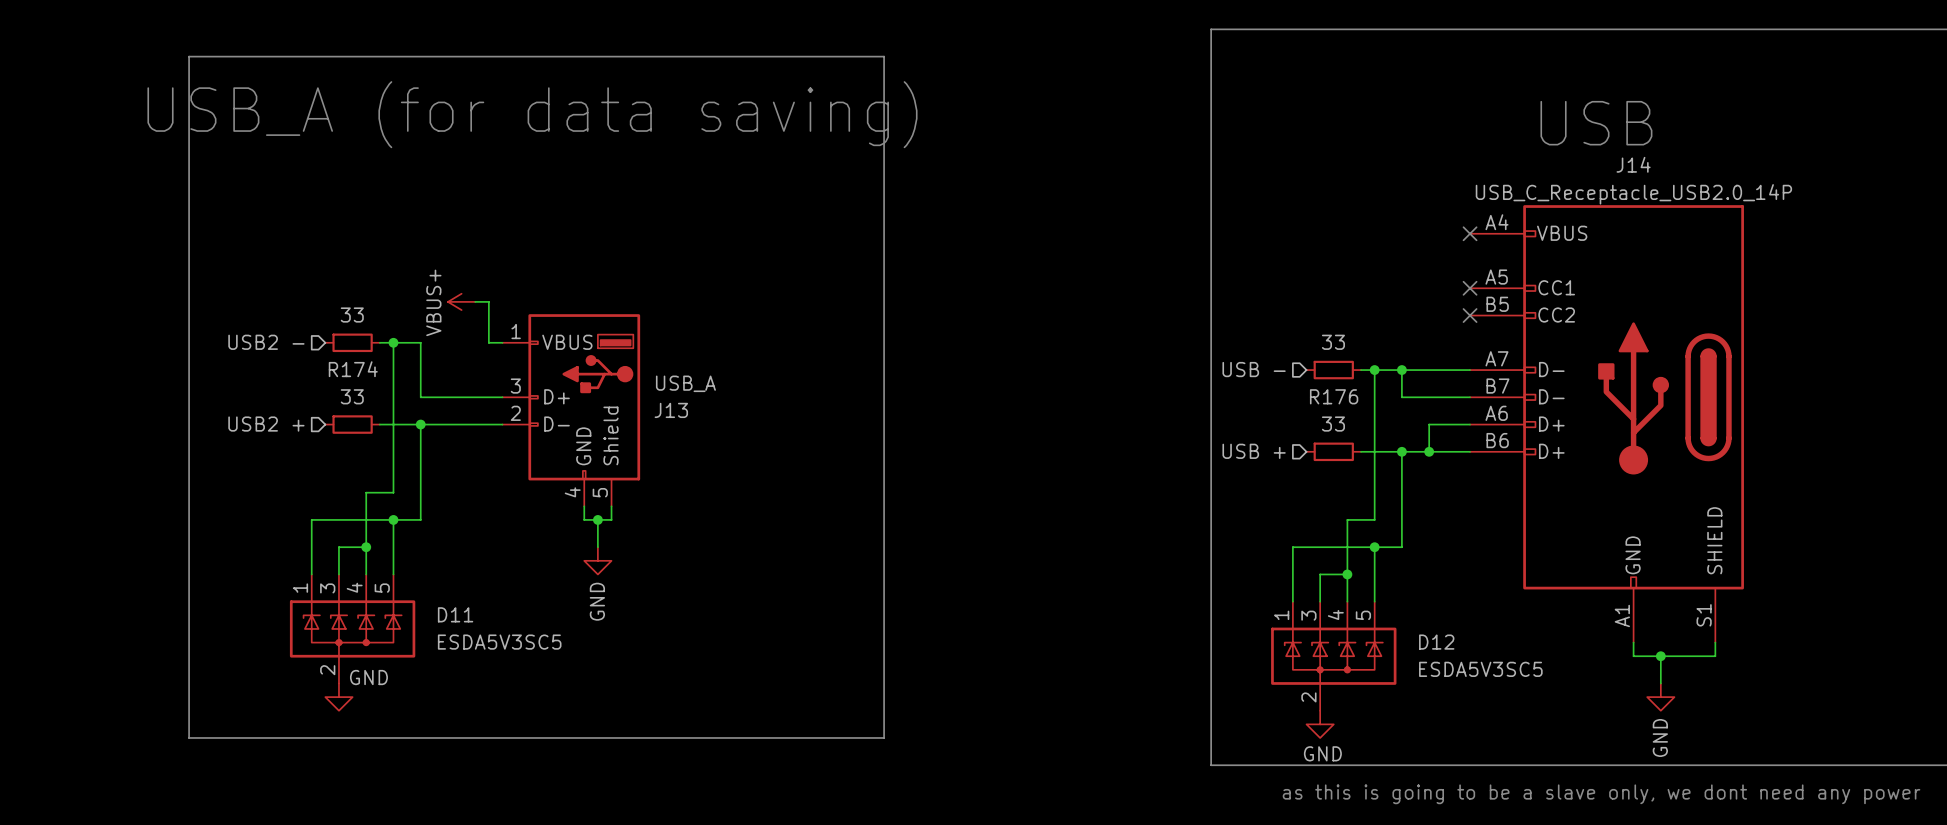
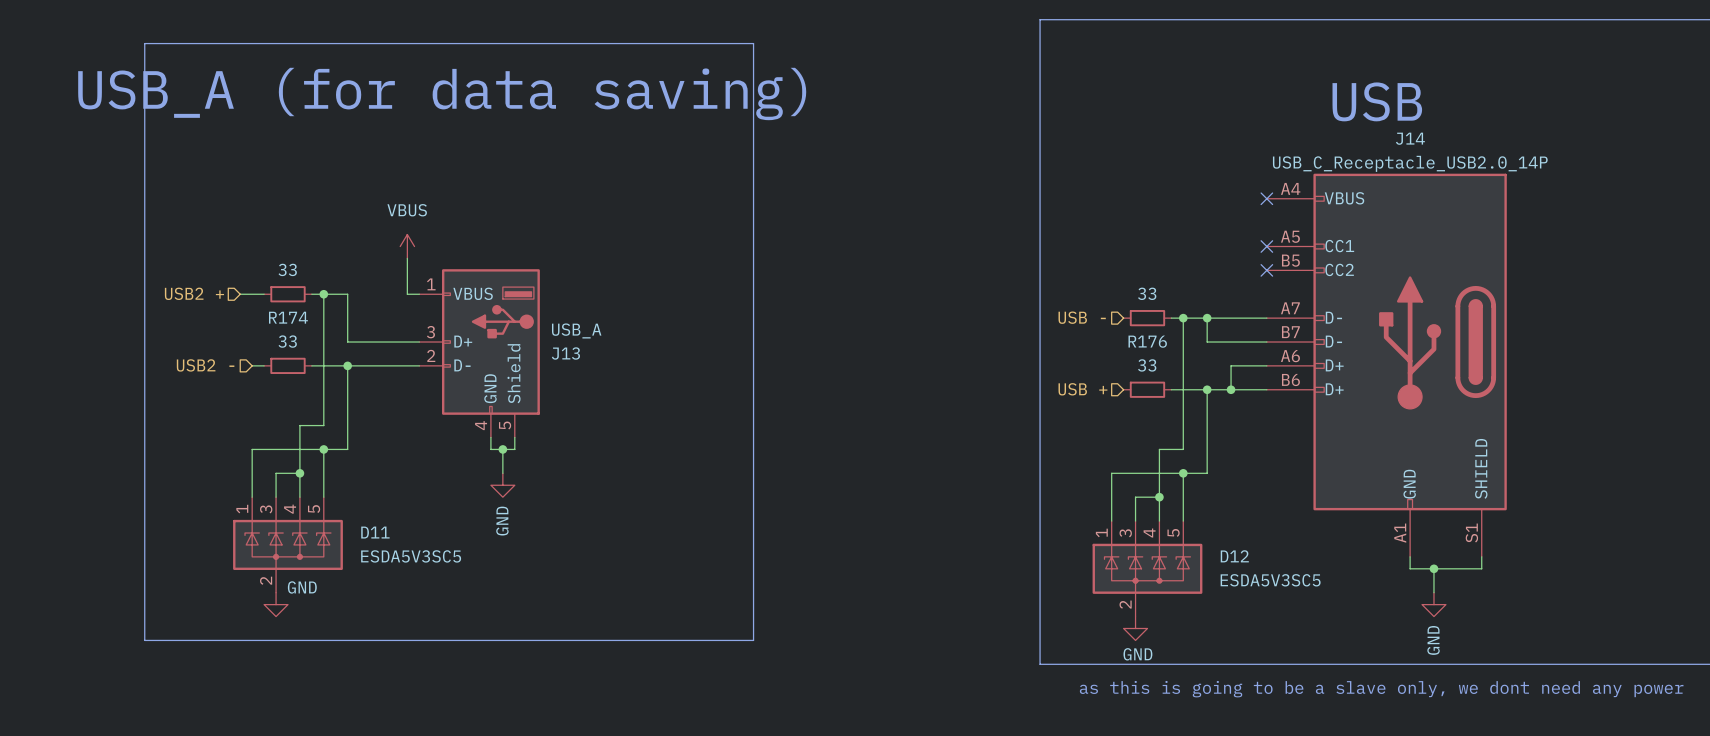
power symbol: none -> VBUS (407, 246)
power symbol: VBUS+ (461, 301) -> none
wire: (475, 301) (488, 301) -> (252, 365) (264, 365)
hierarchical label position: USB2 - (266, 342) -> USB2 - (205, 365)
wire: none -> (240, 294) (264, 294)
hierarchical label position: USB2 + (266, 424) -> USB2 + (194, 293)

